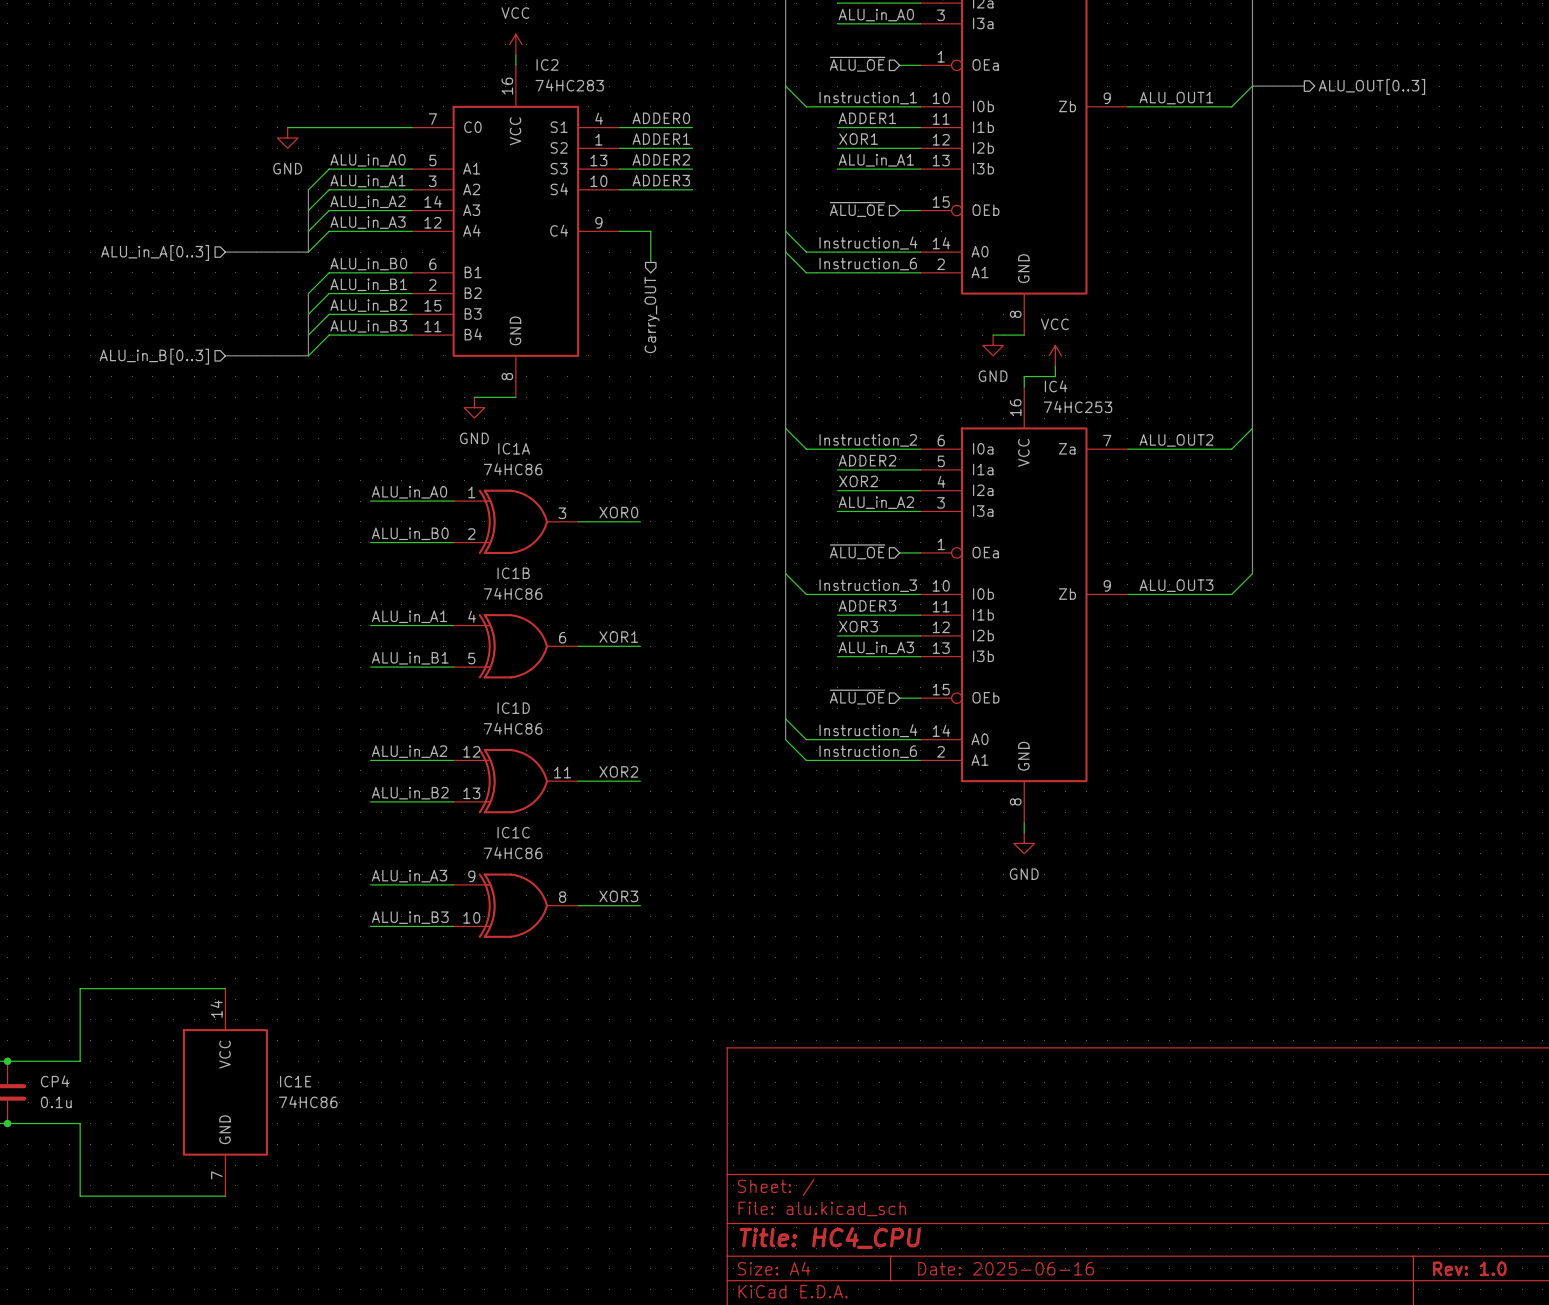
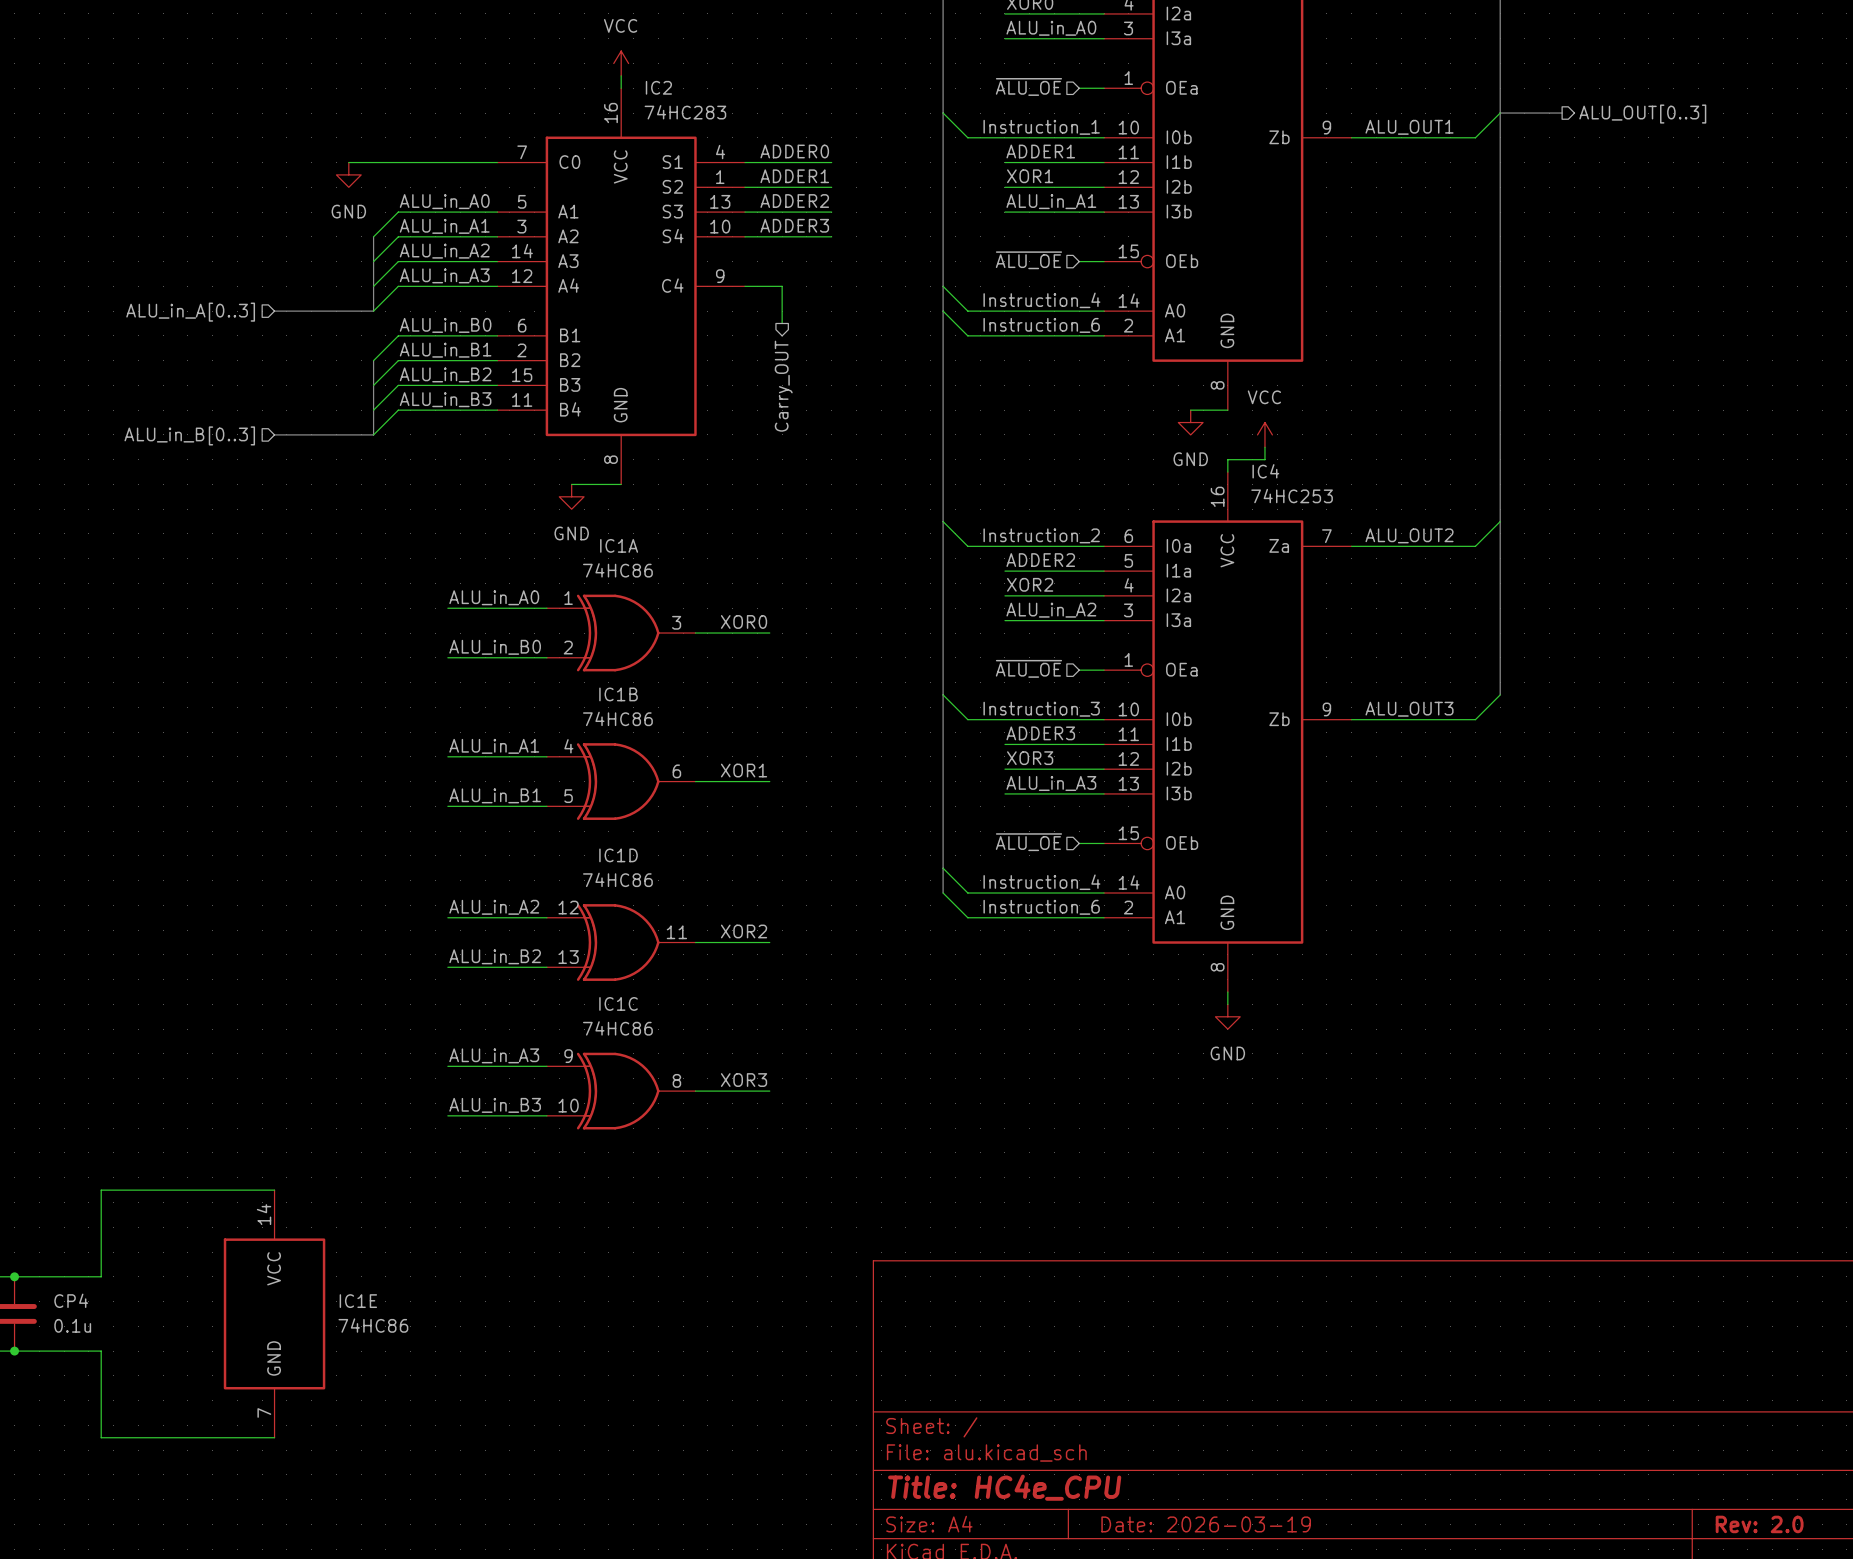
title block: Title: HC4_CPU (830, 1237) -> Title: HC4e_CPU (1004, 1487)
title block: Date: 2025-06-16 (1006, 1268) -> Date: 2026-03-19 (1206, 1524)
title block: Rev: 1.0 (1469, 1268) -> Rev: 2.0 (1759, 1524)

